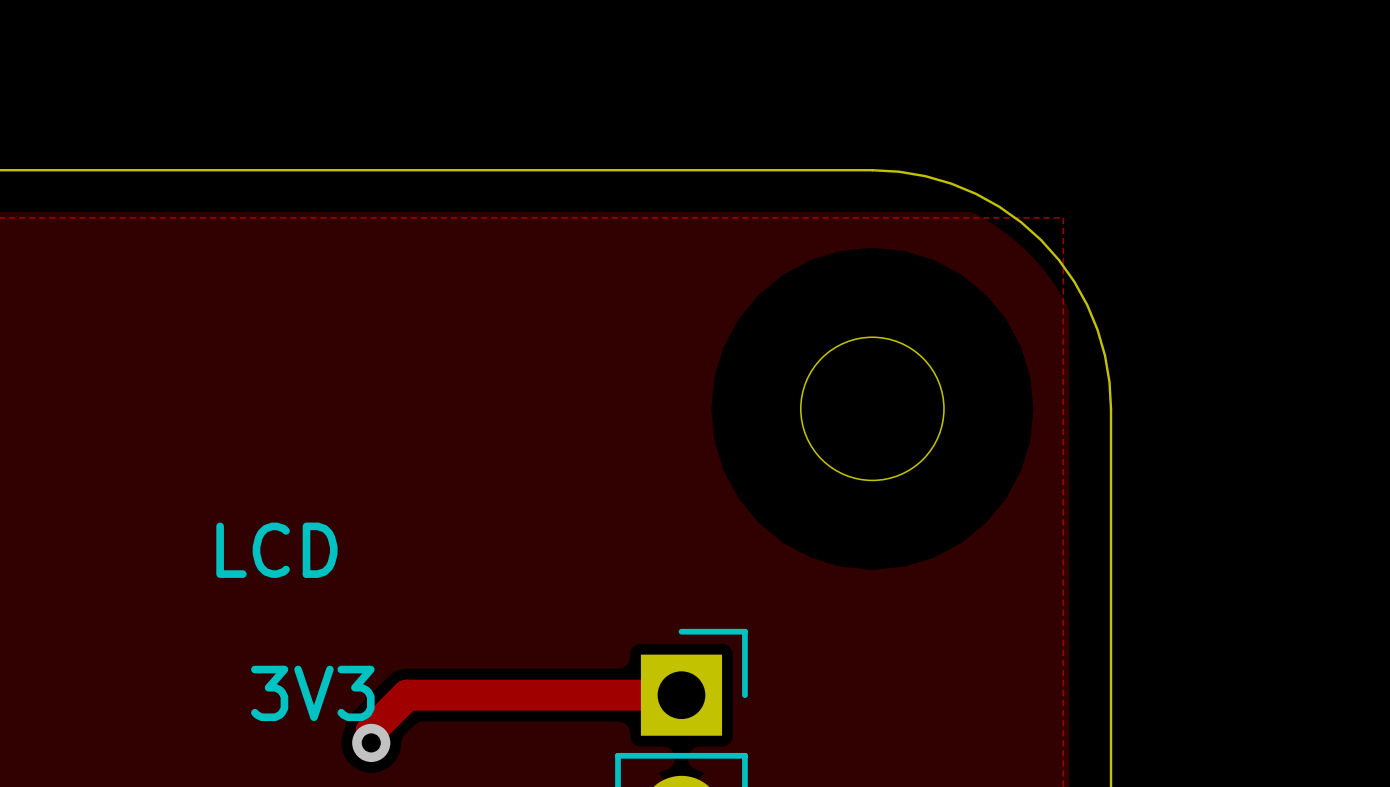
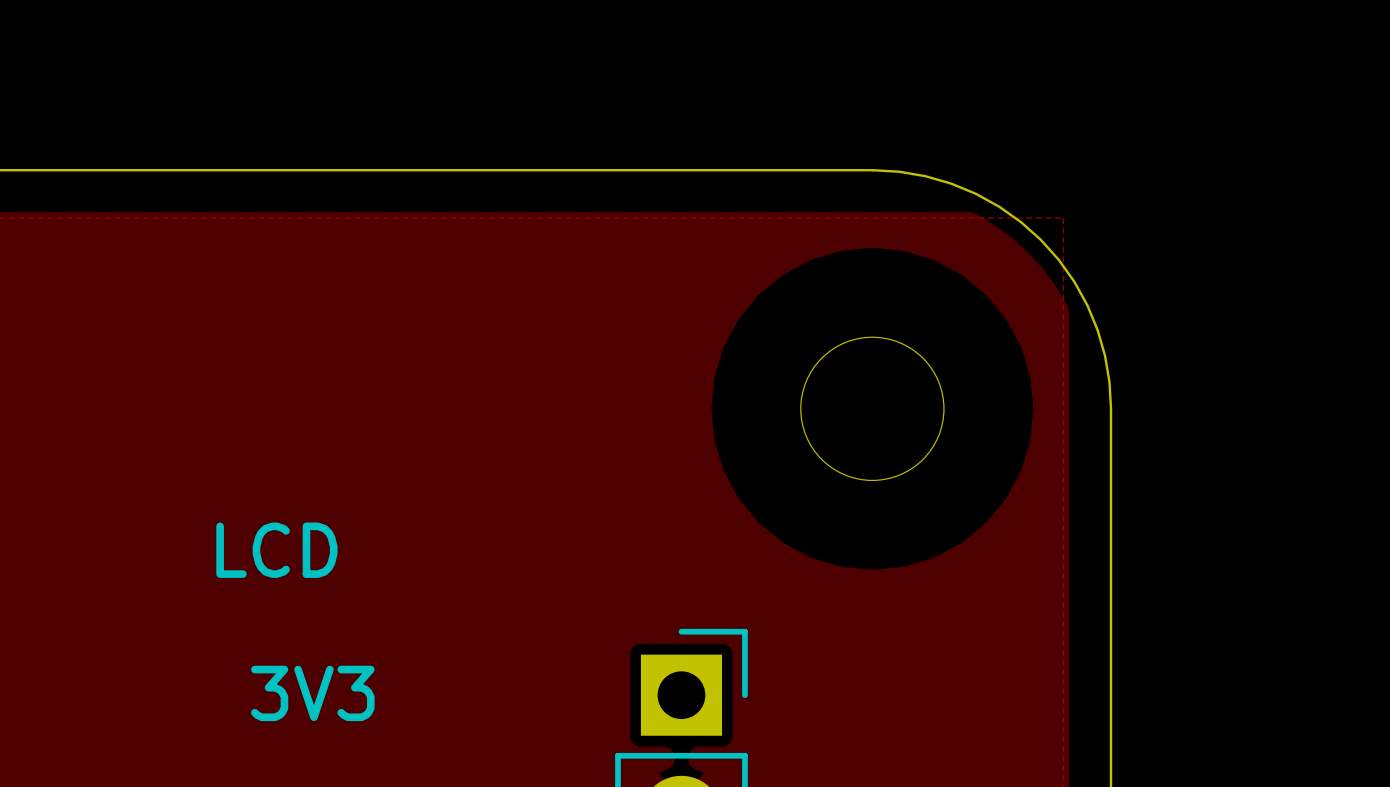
track: (681, 695) (407, 695) (371, 730) (371, 742) -> none
via: (371, 742) -> none

